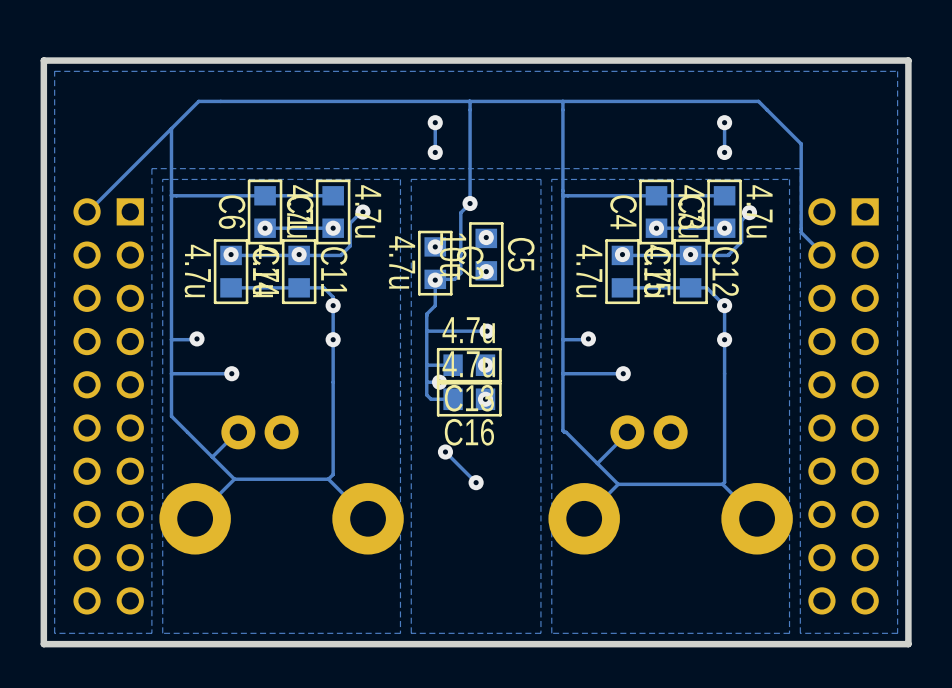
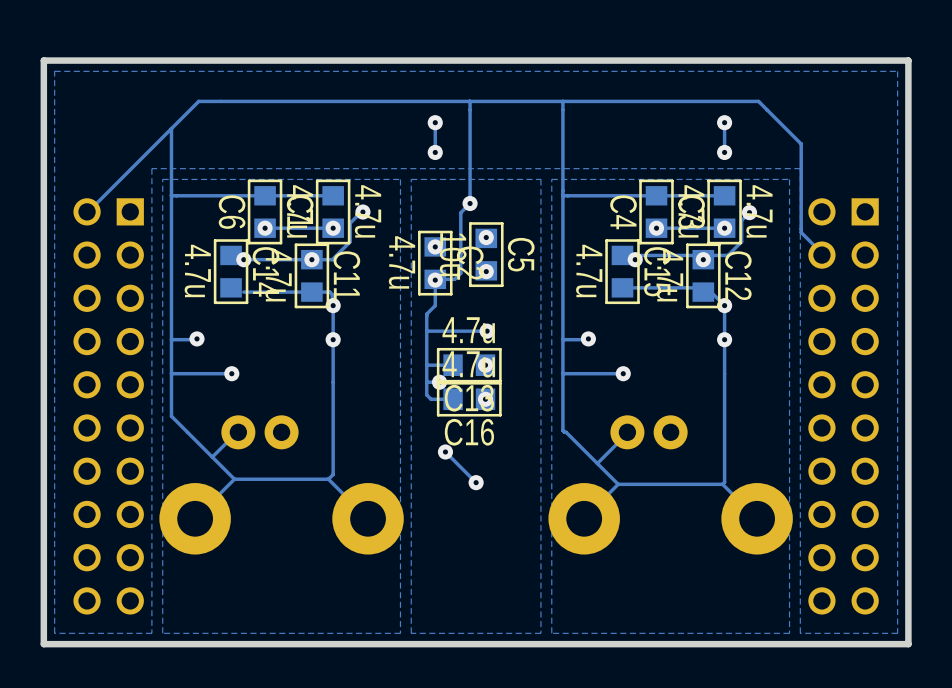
track: (350, 241) (350, 246) (340, 255) (231, 254) -> (350, 241) (332, 259) (243, 259)
via position: (231, 254) -> (243, 259)
via position: (299, 254) -> (311, 259)
via position: (622, 254) -> (635, 259)
via position: (690, 254) -> (703, 259)
C11 position: (299, 271) -> (311, 275)
C12 position: (690, 271) -> (703, 275)
track: (231, 287) (323, 287) (333, 297) (333, 306) -> (243, 292) (329, 292) (332, 294) (333, 306)

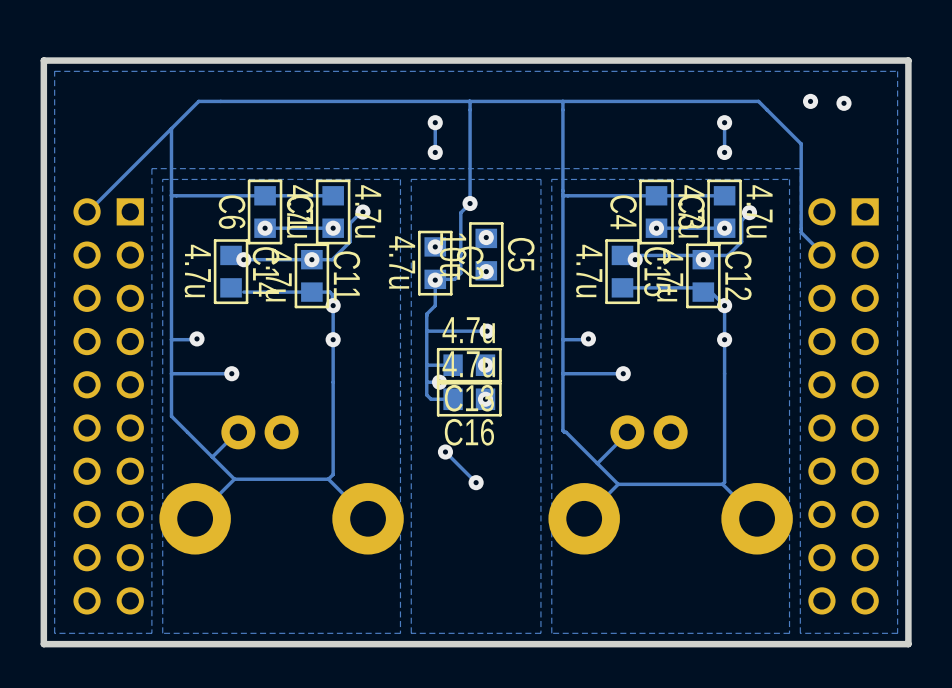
via: none -> (810, 101)
via: none -> (843, 103)

